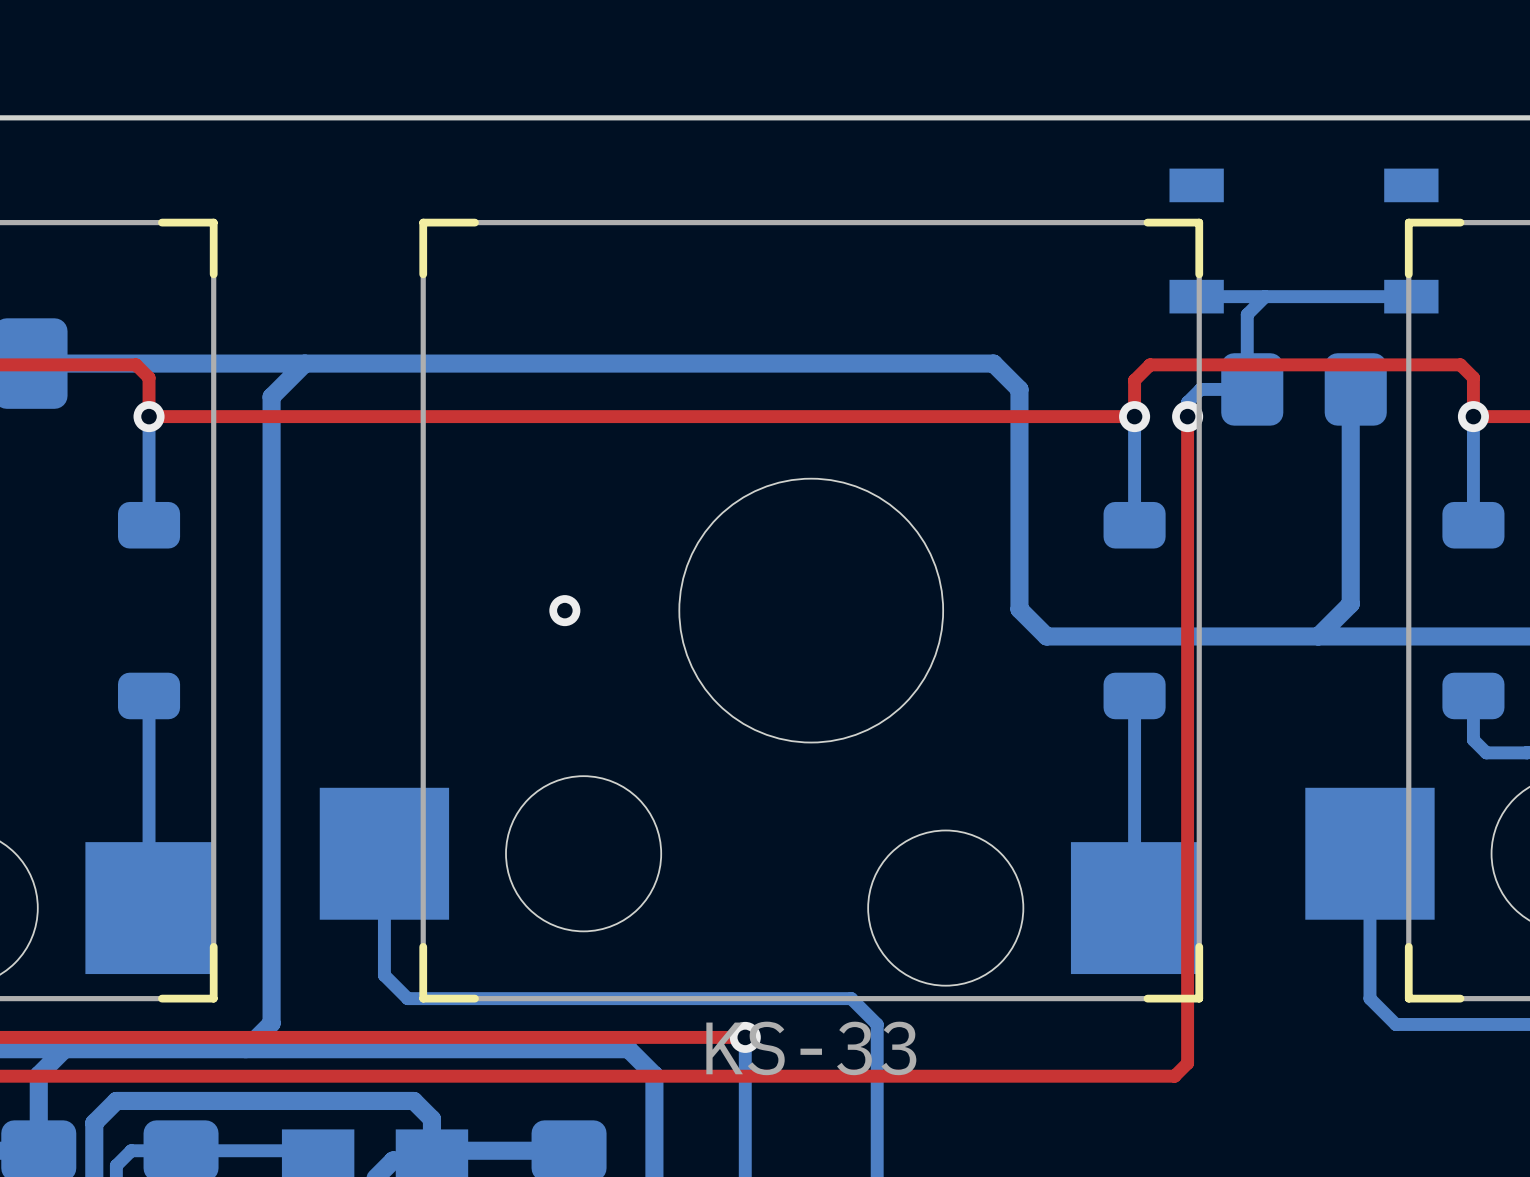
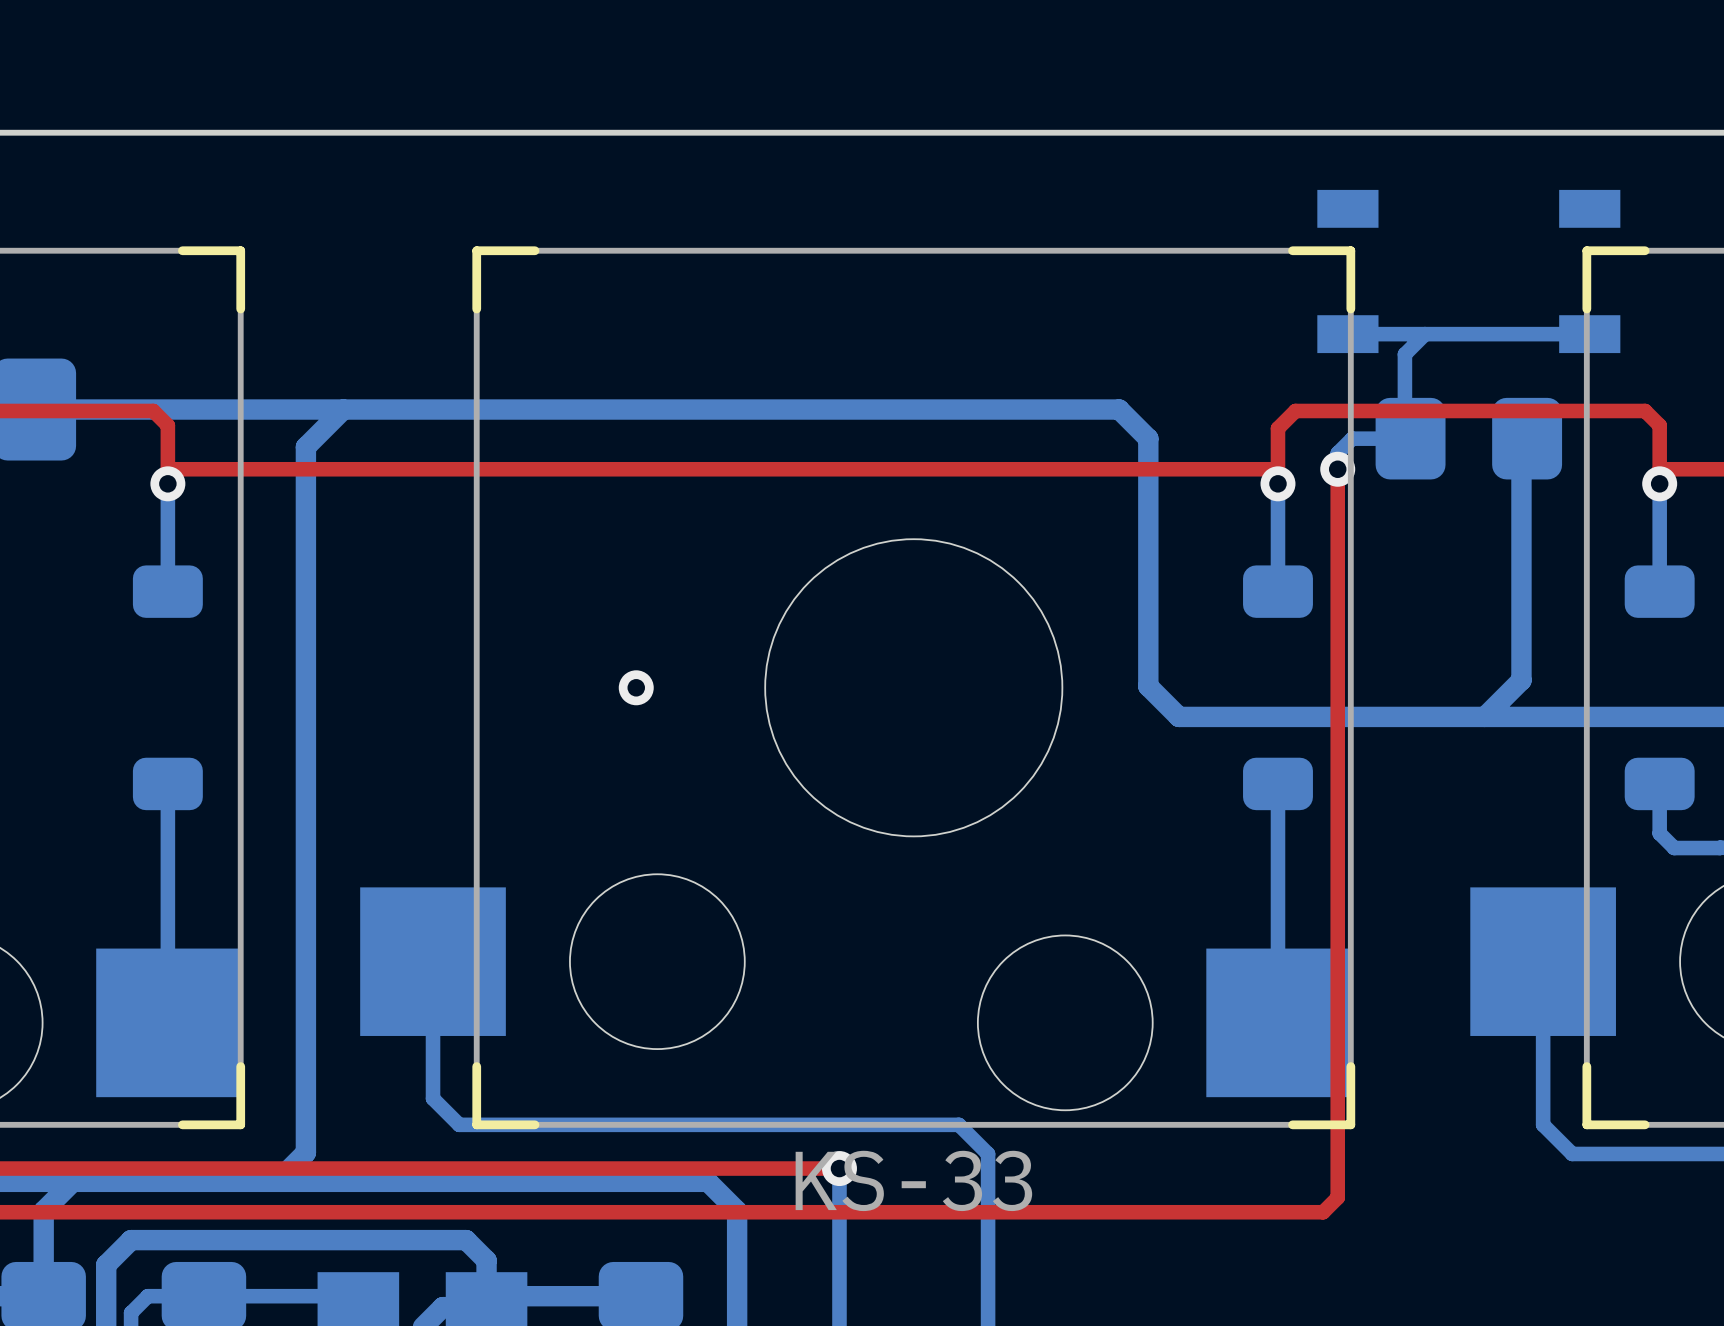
via position: (149, 416) -> (167, 483)
via position: (1134, 416) -> (1277, 483)
via position: (1473, 416) -> (1659, 483)

